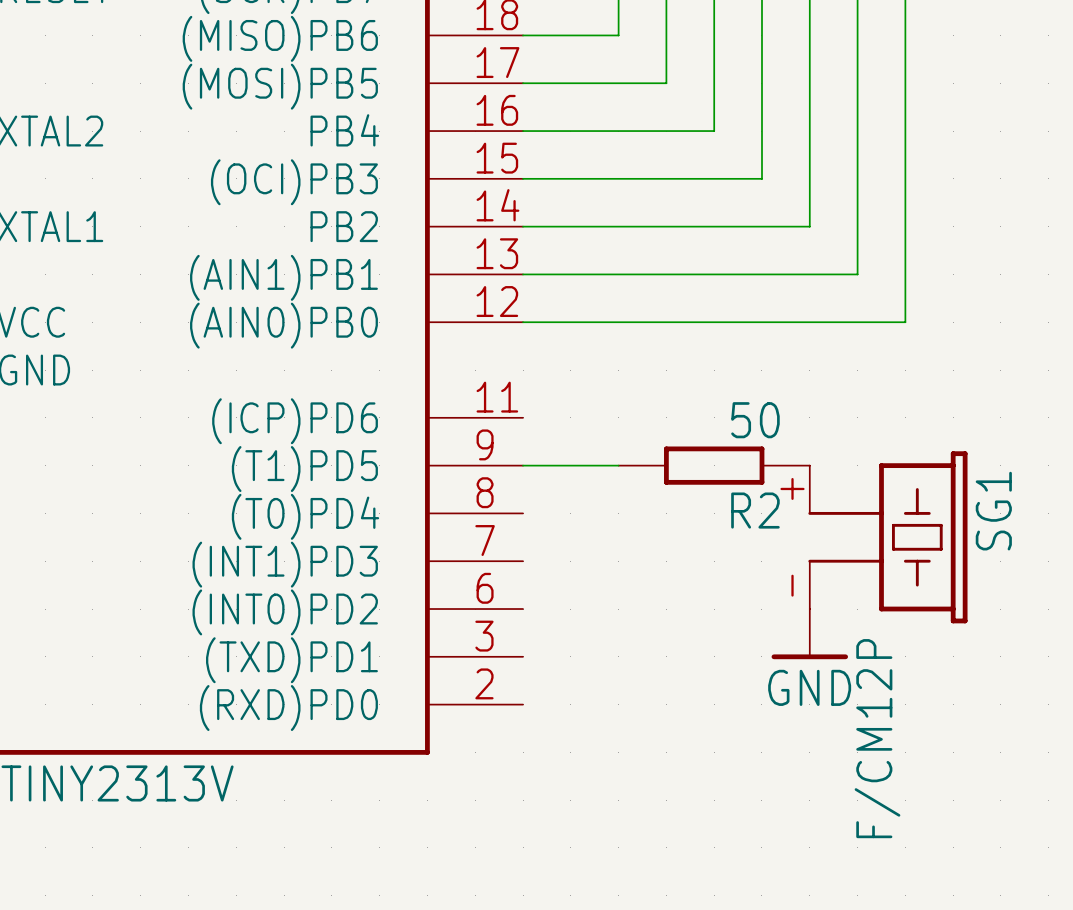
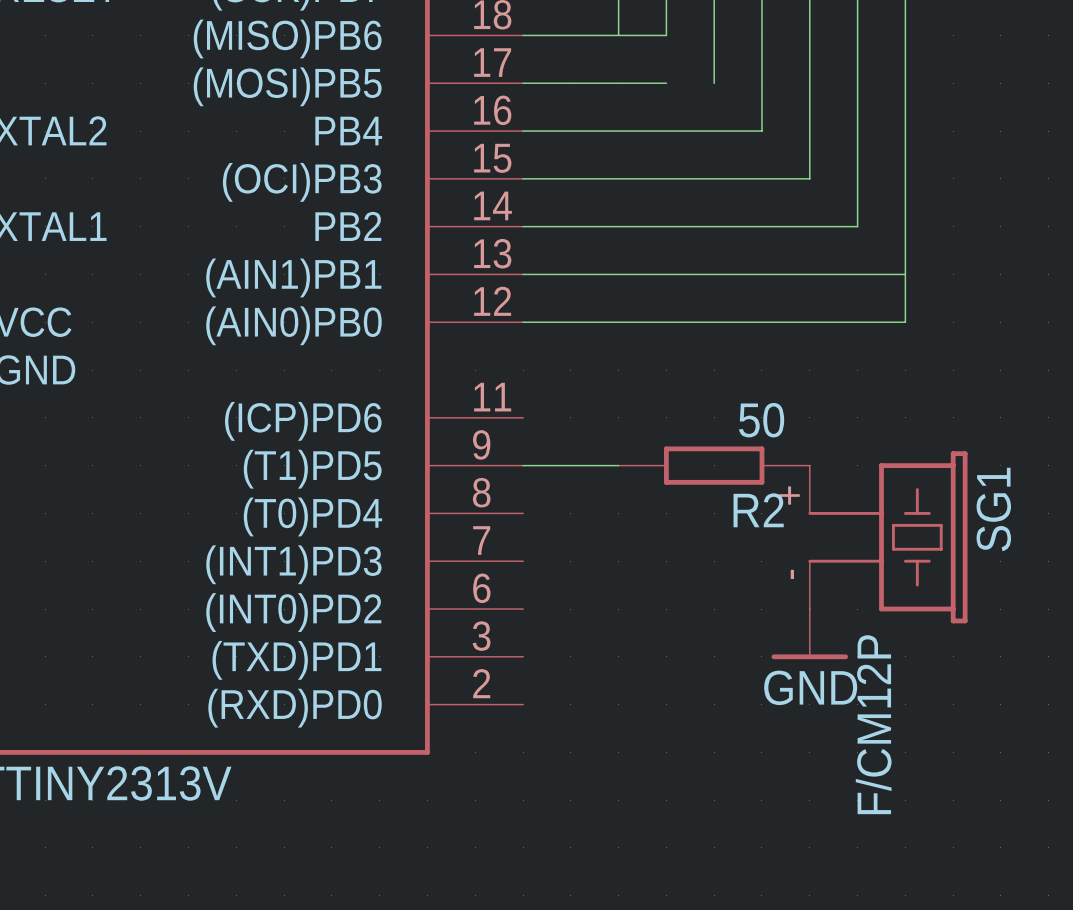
wire: (666, 35) (666, 83) -> (666, 35) (618, 35)
wire: (714, 83) (714, 131) -> (761, 131) (714, 131)
wire: (761, 131) (761, 178) -> (809, 178) (761, 178)
wire: (809, 178) (809, 226) -> (857, 226) (809, 226)
wire: (857, 226) (857, 274) -> (905, 274) (857, 274)

